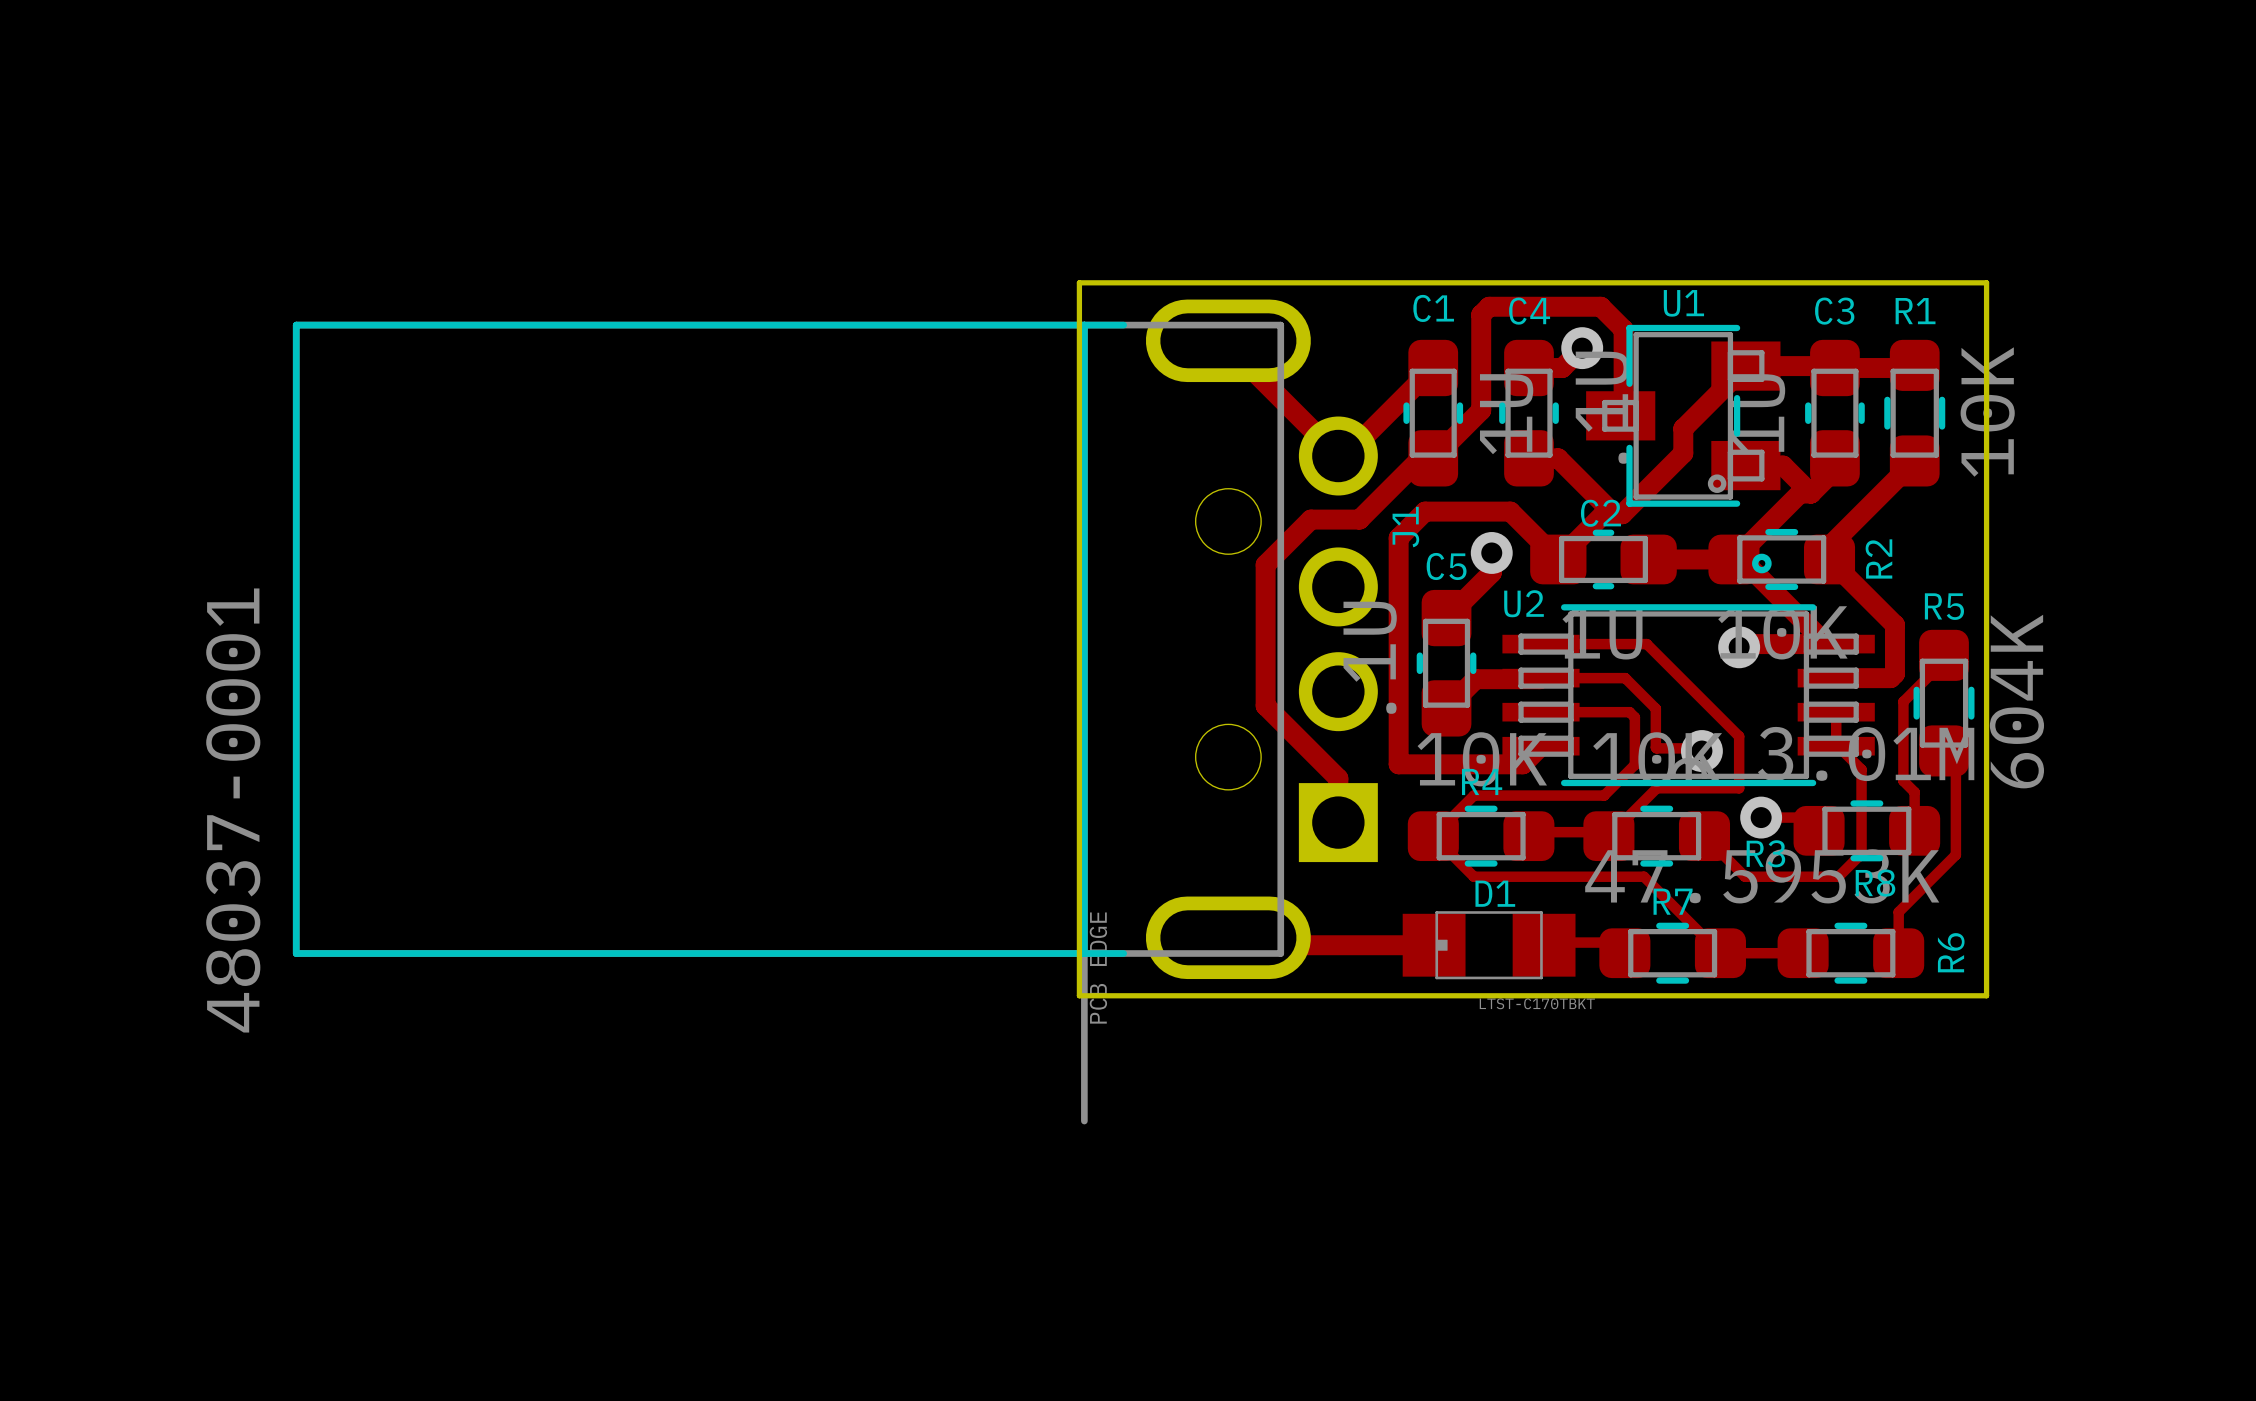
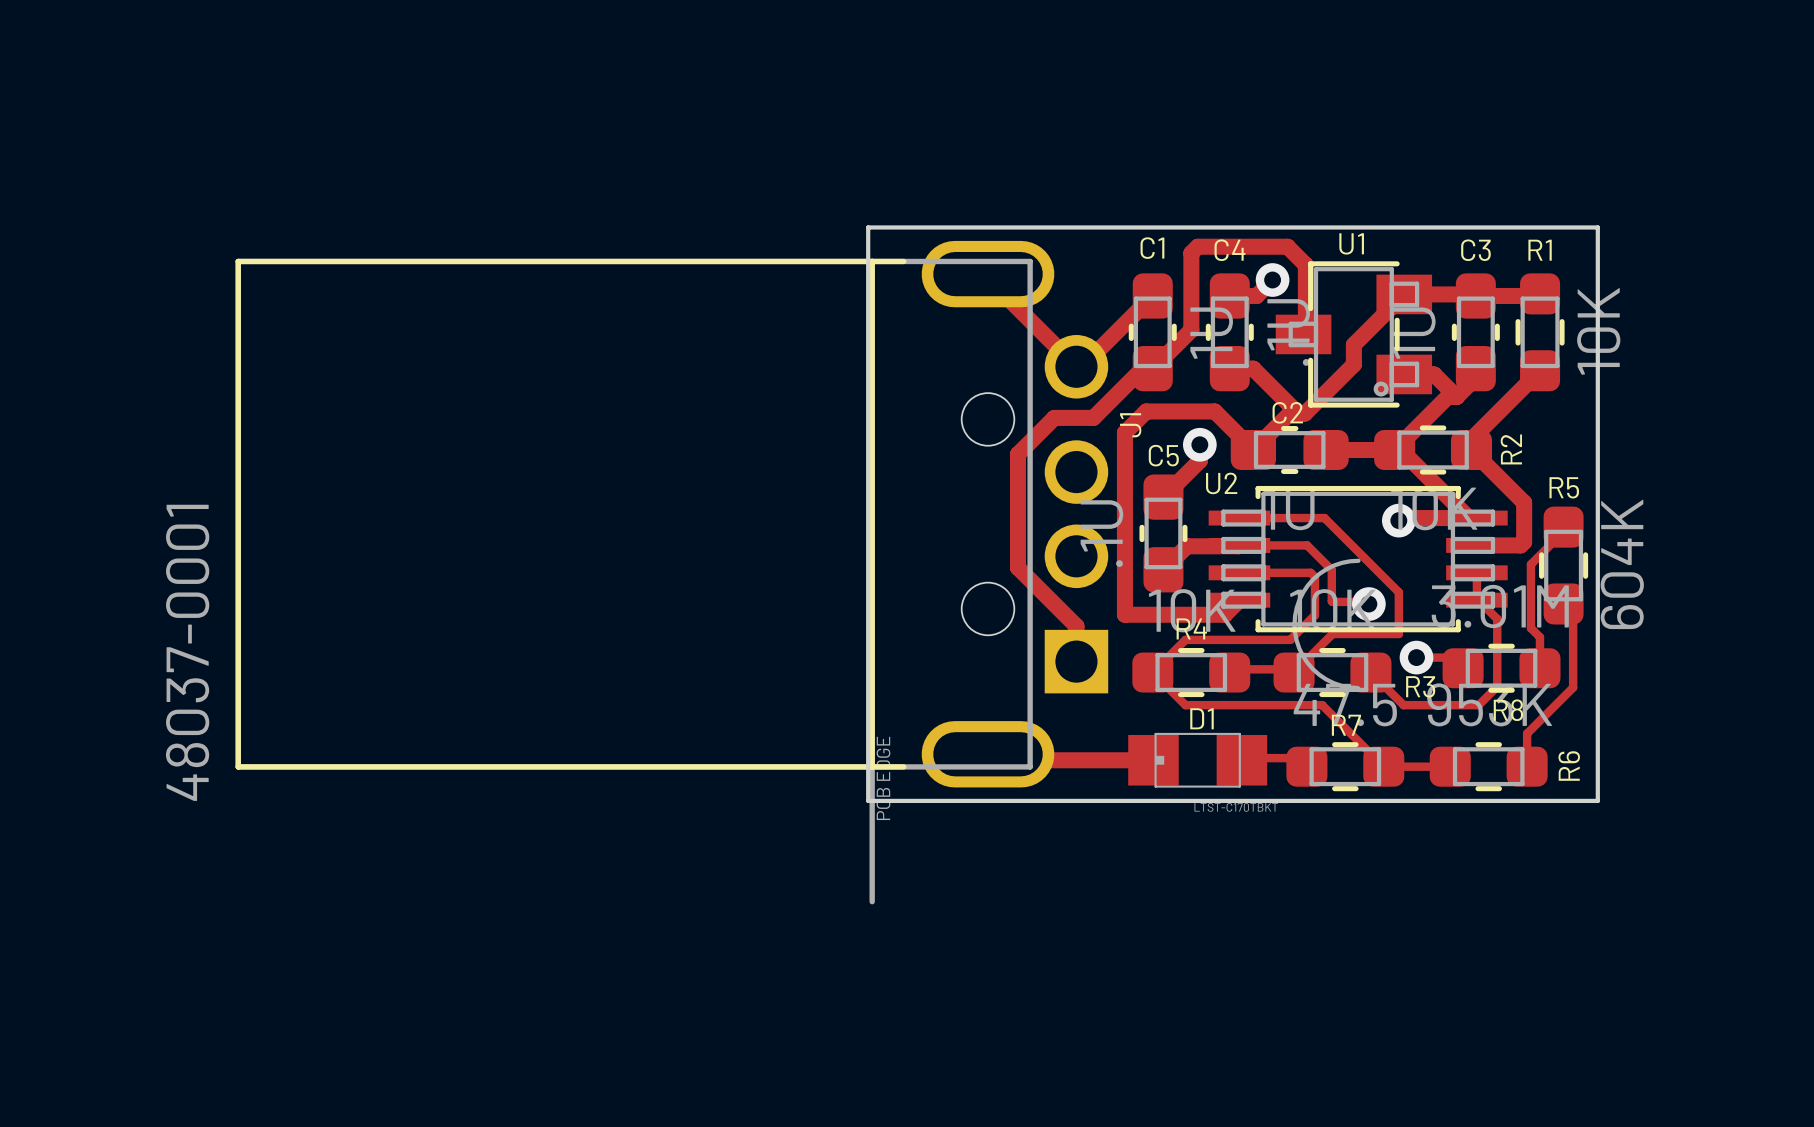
U1 footprint: [1586, 324, 1781, 574] -> [1275, 261, 1433, 408]
U2 footprint: [1502, 604, 1875, 787] -> [1208, 485, 1508, 691]

